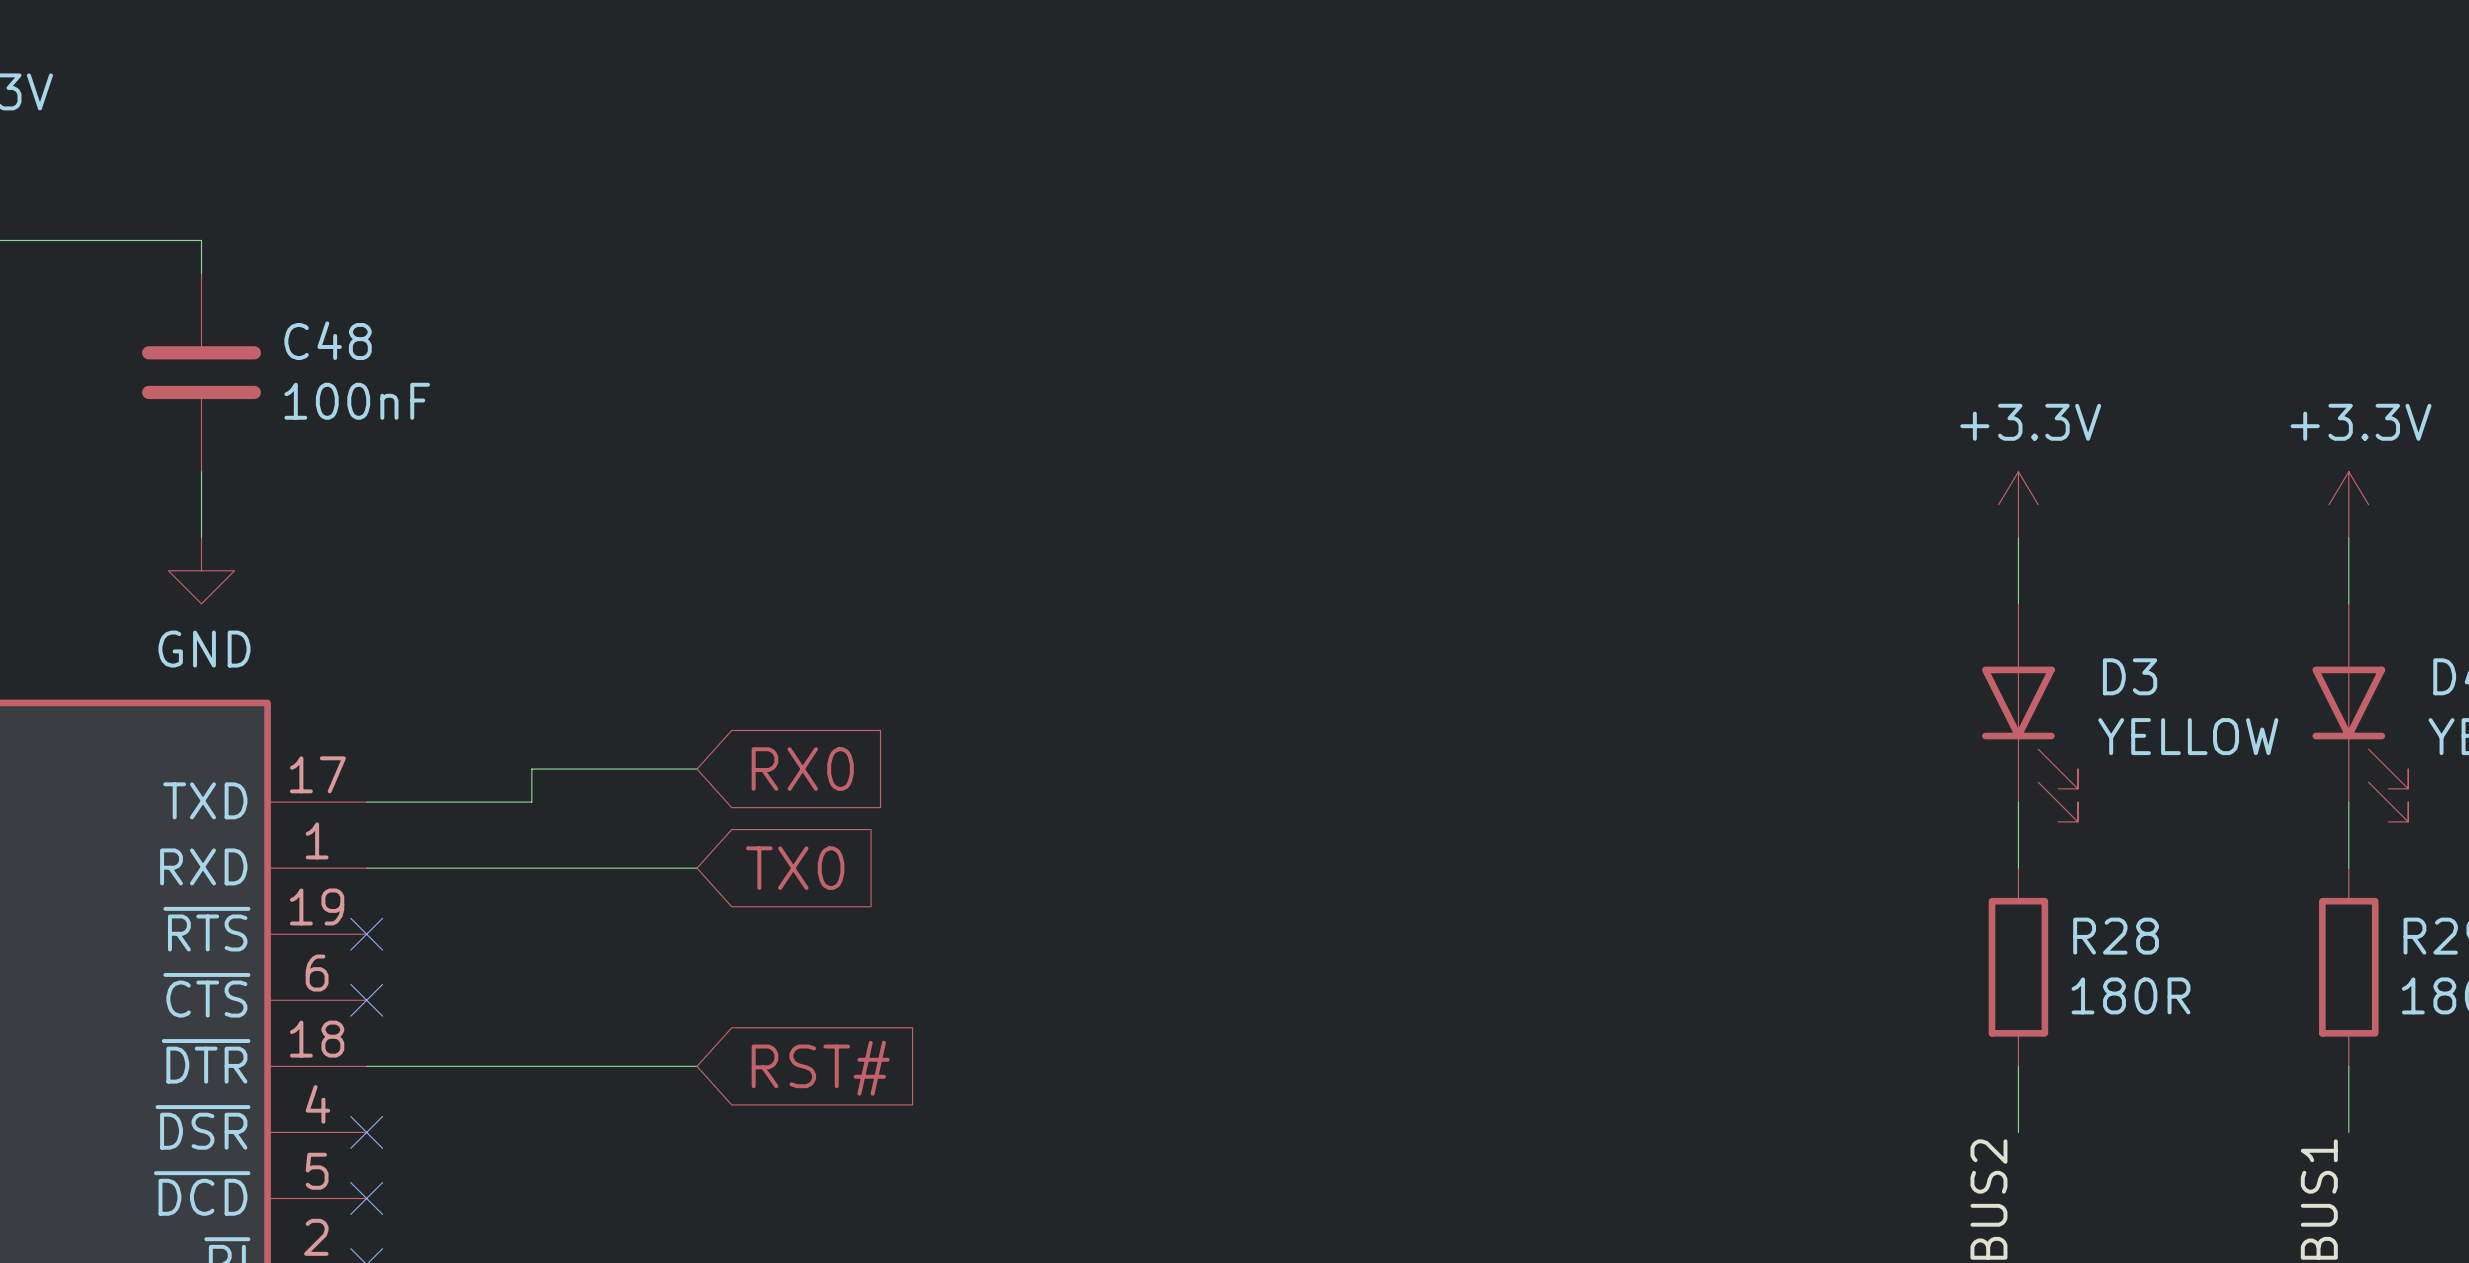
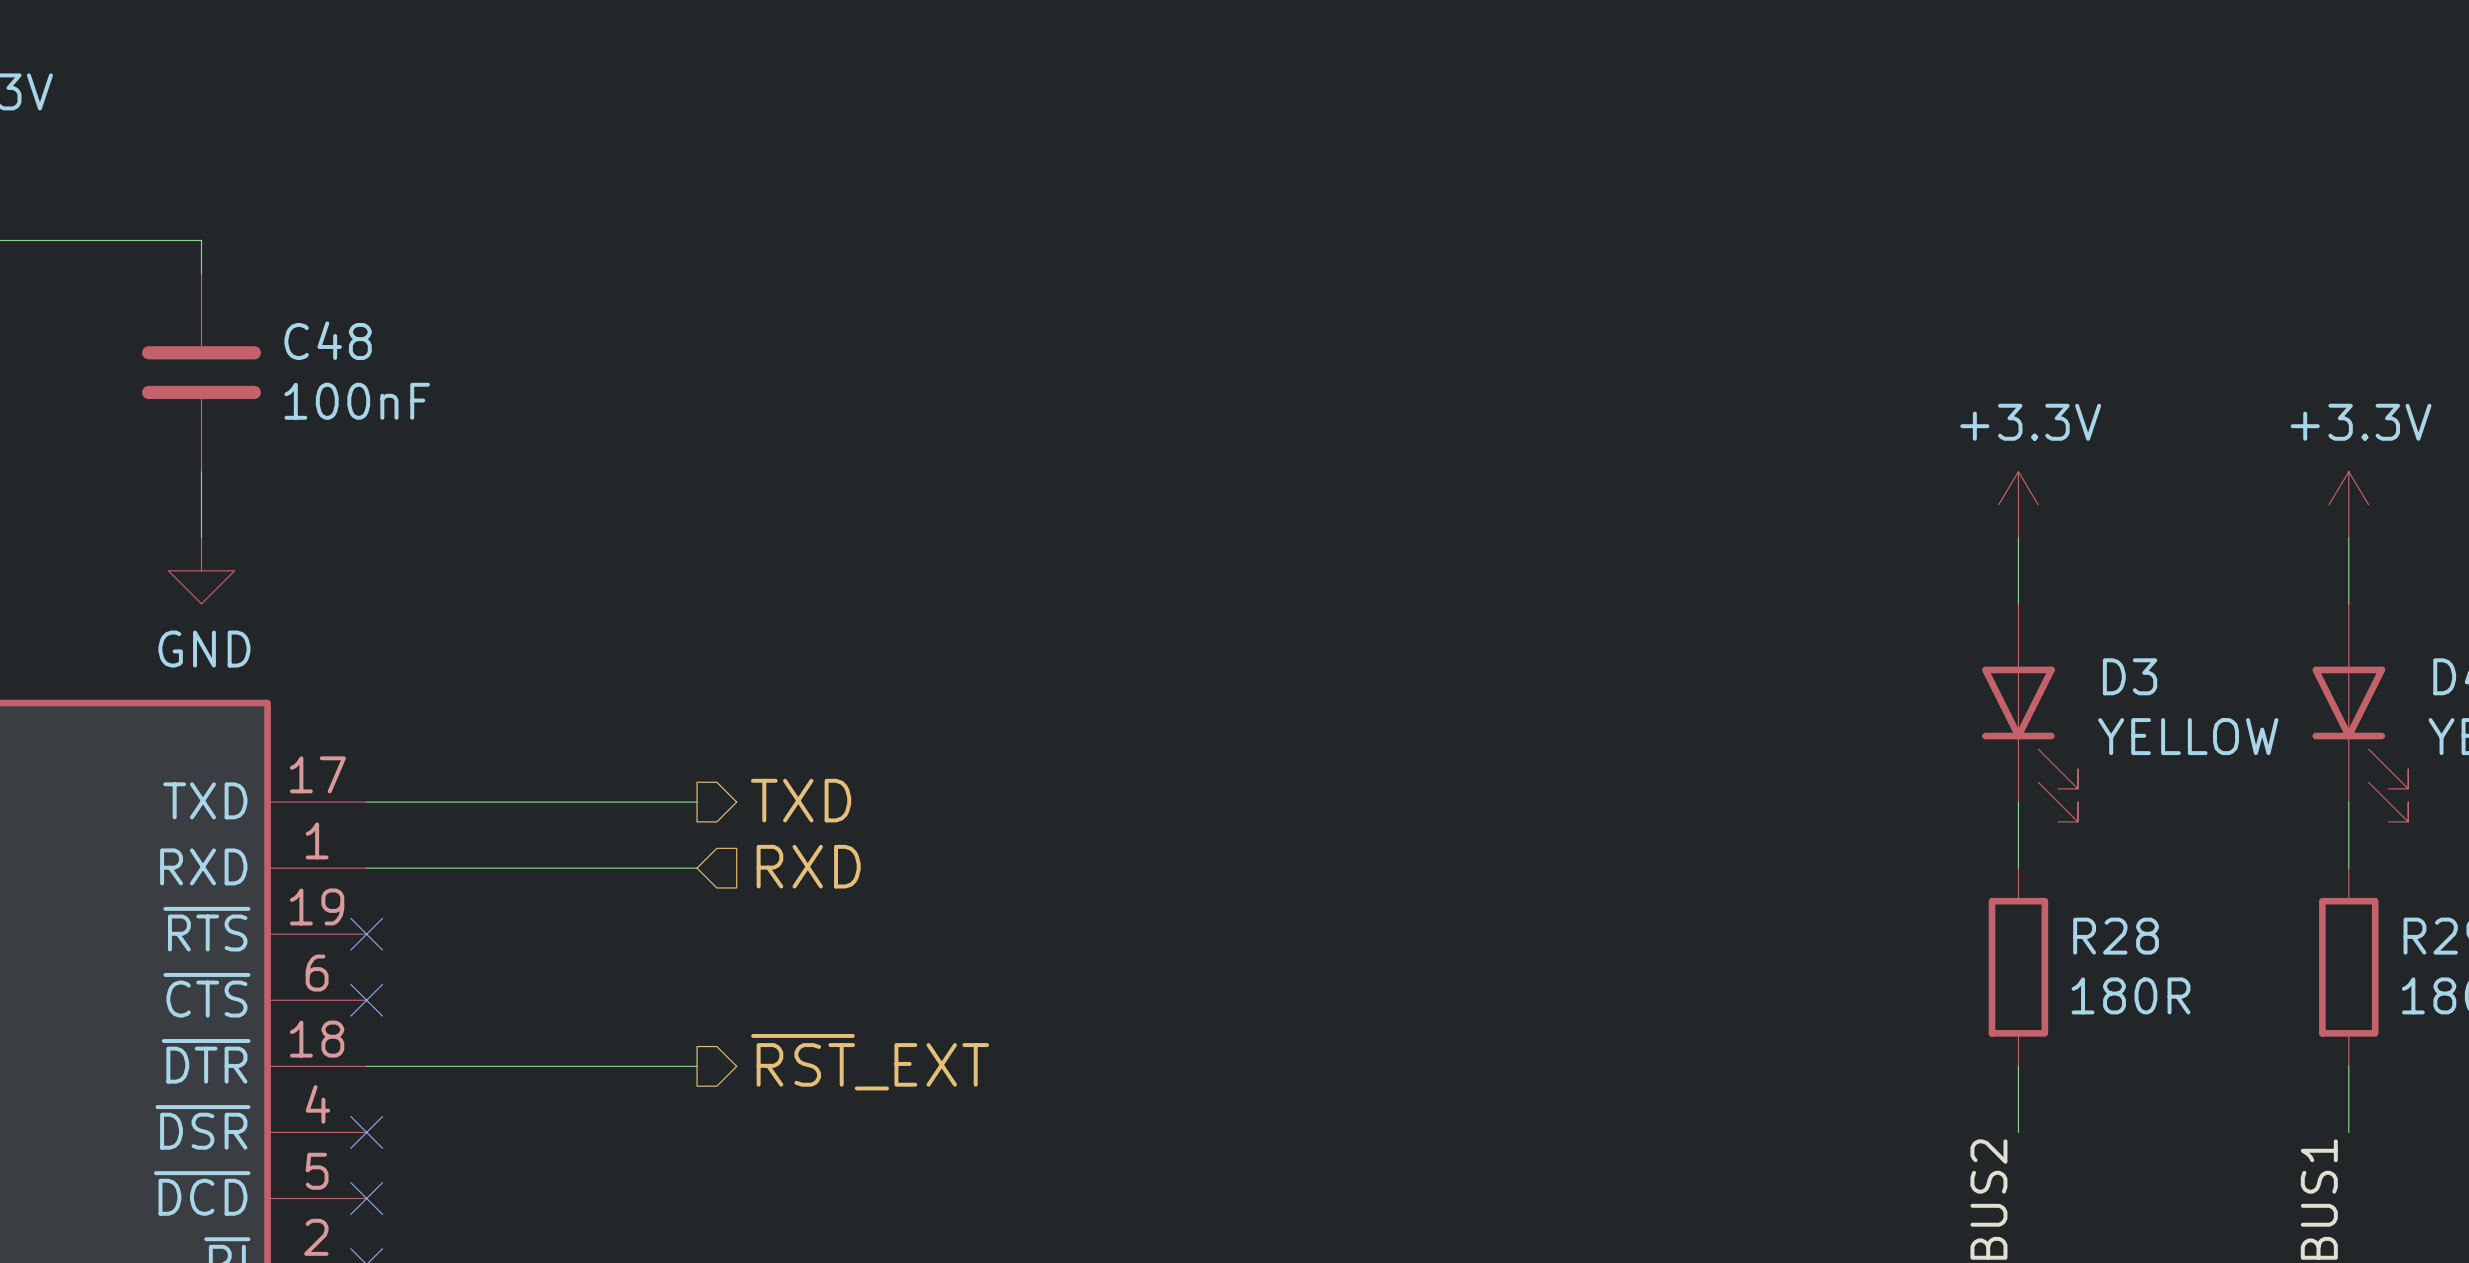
wire: (697, 769) (531, 769) (531, 802) -> (697, 802) (531, 802)
global label: RX0 (802, 769) -> none
hierarchical label: none -> TXD (801, 800)
hierarchical label: none -> RXD (808, 866)
global label: TX0 (795, 868) -> none
hierarchical label: none -> ~{RST}_EXT (870, 1062)
global label: RST# (820, 1068) -> none

